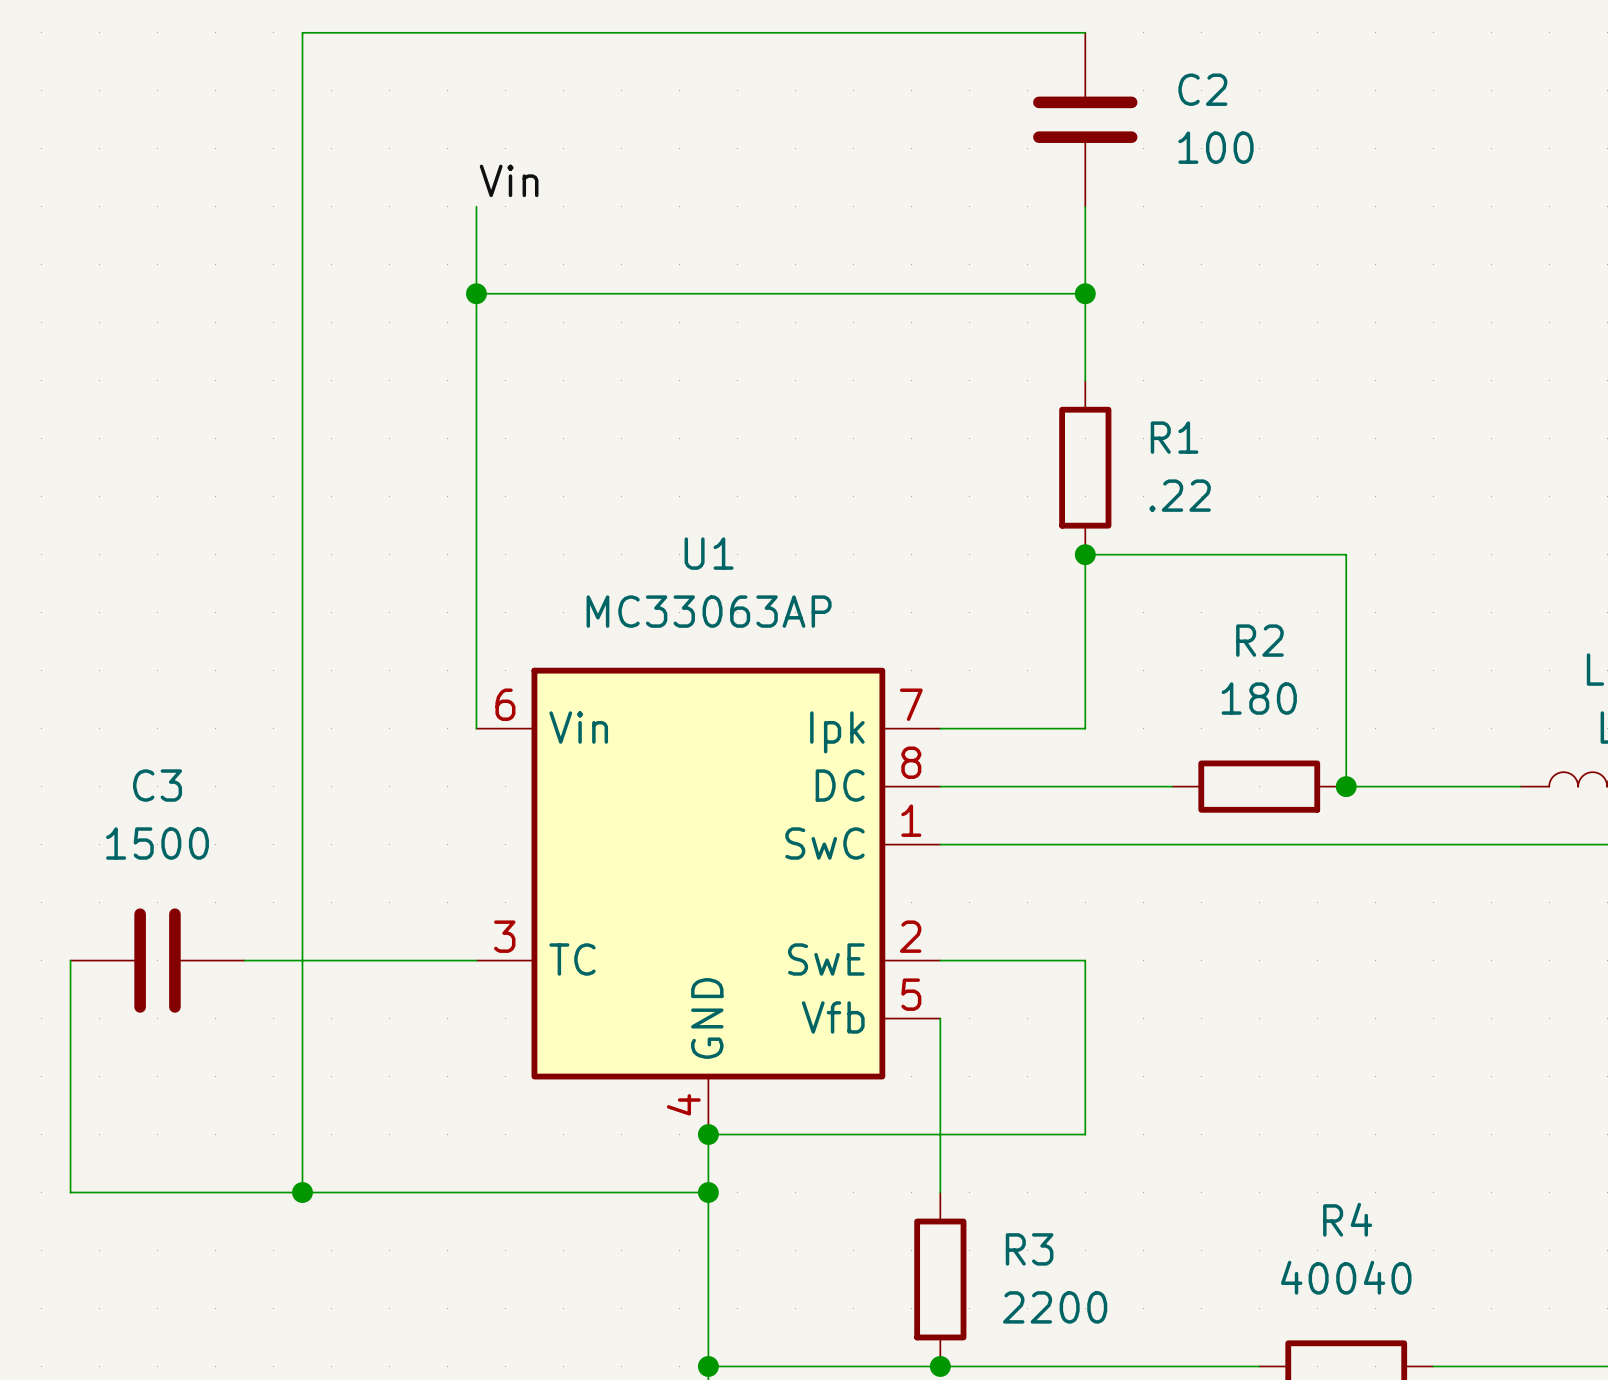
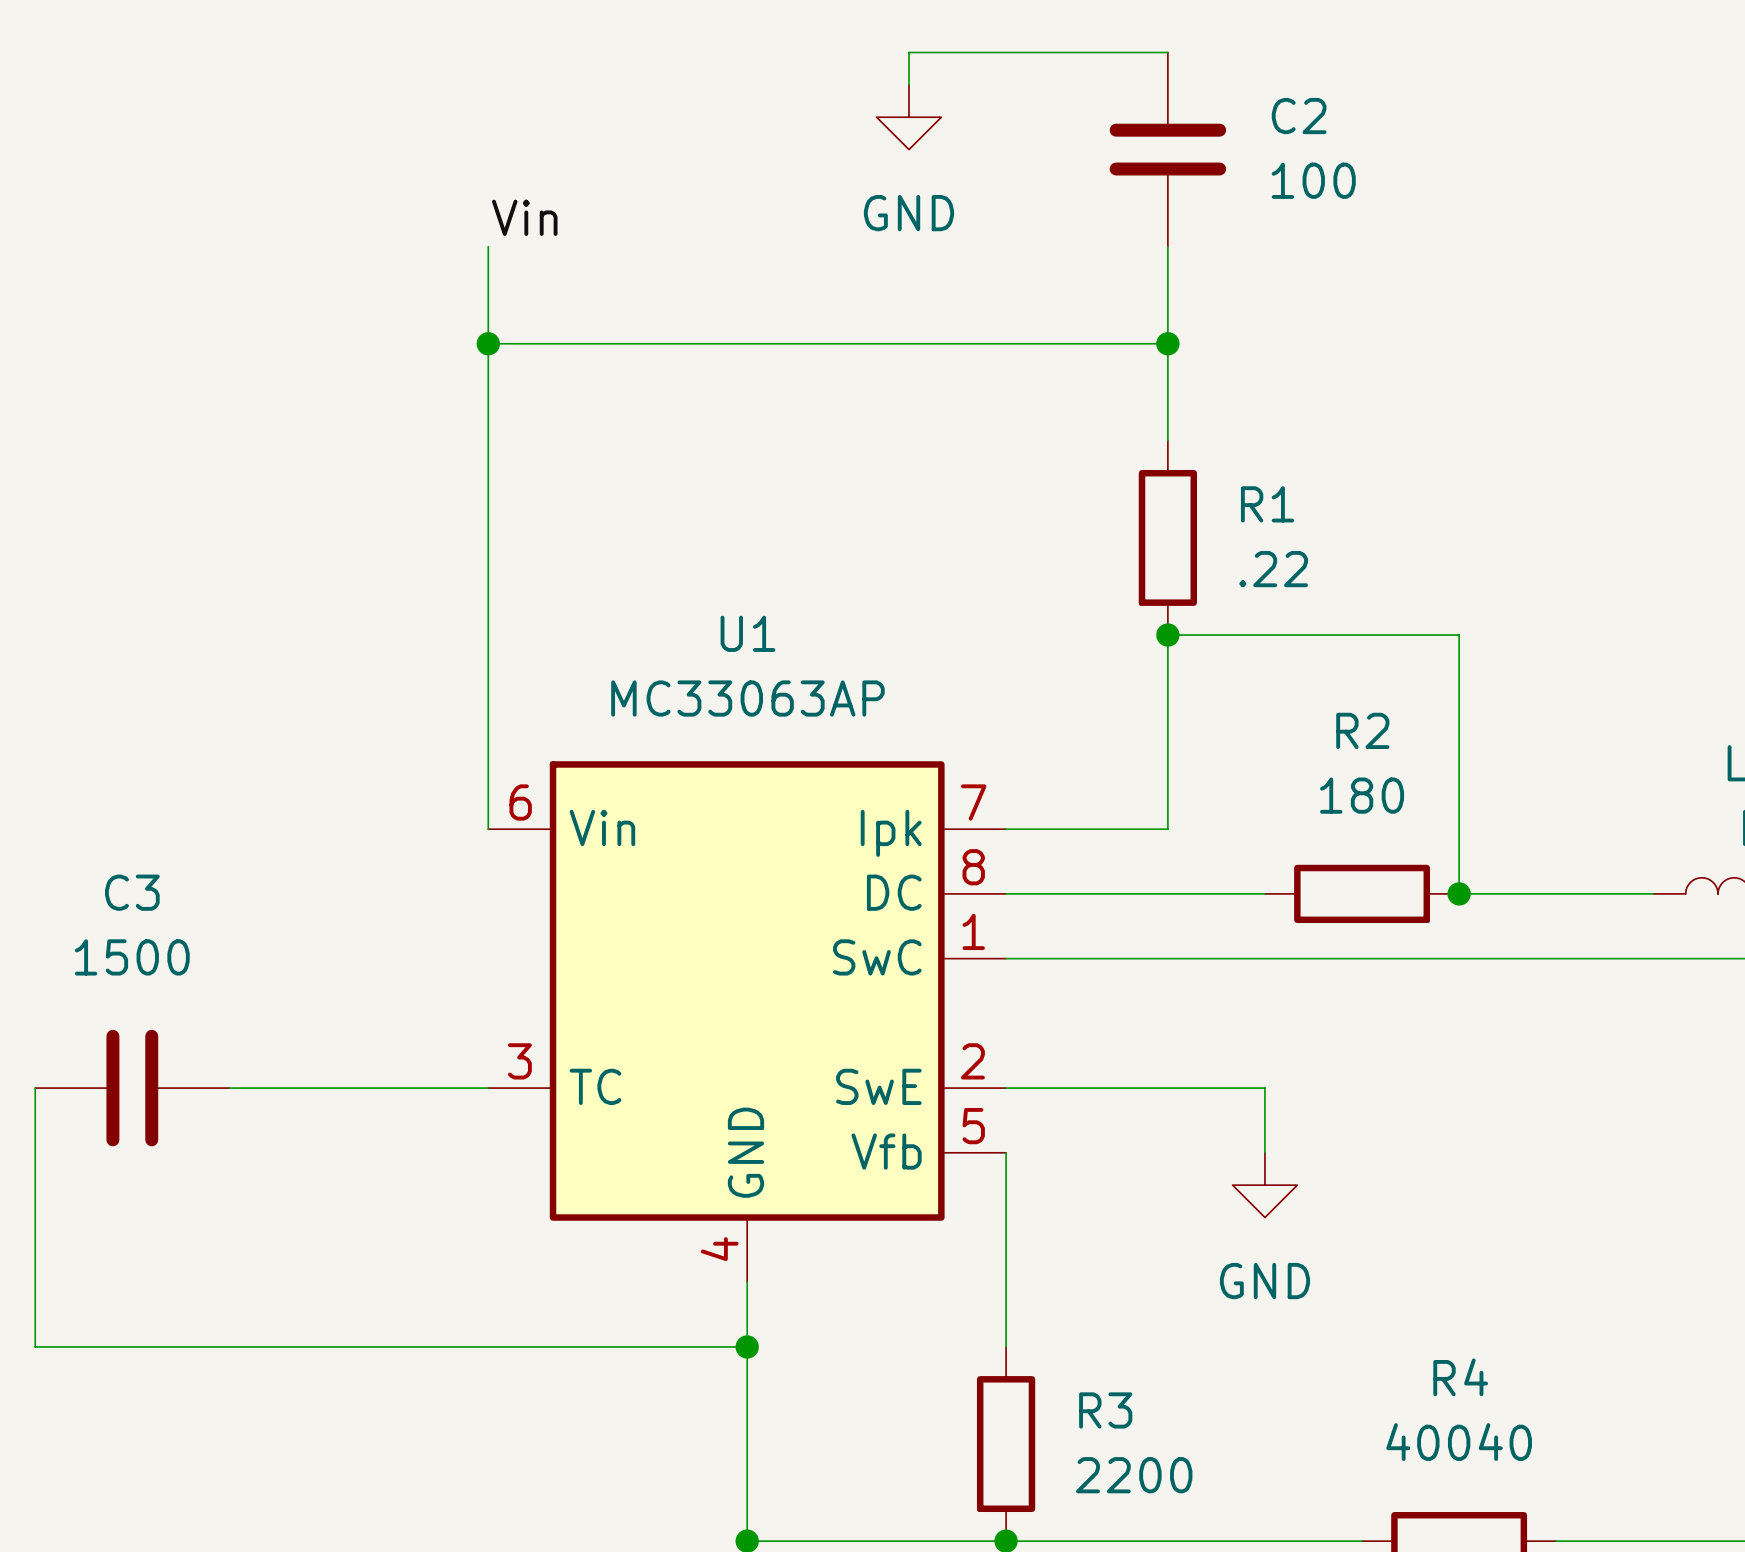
wire: (853, 32) (302, 32) (302, 1192) -> (909, 52) (909, 84)
power symbol: none -> GND (909, 117)
wire: (1085, 960) (1085, 1134) (708, 1134) -> (1167, 1088) (1264, 1088) (1264, 1152)
power symbol: none -> GND (1264, 1185)
junction: (708, 1134) -> none
junction: (302, 1192) -> none

